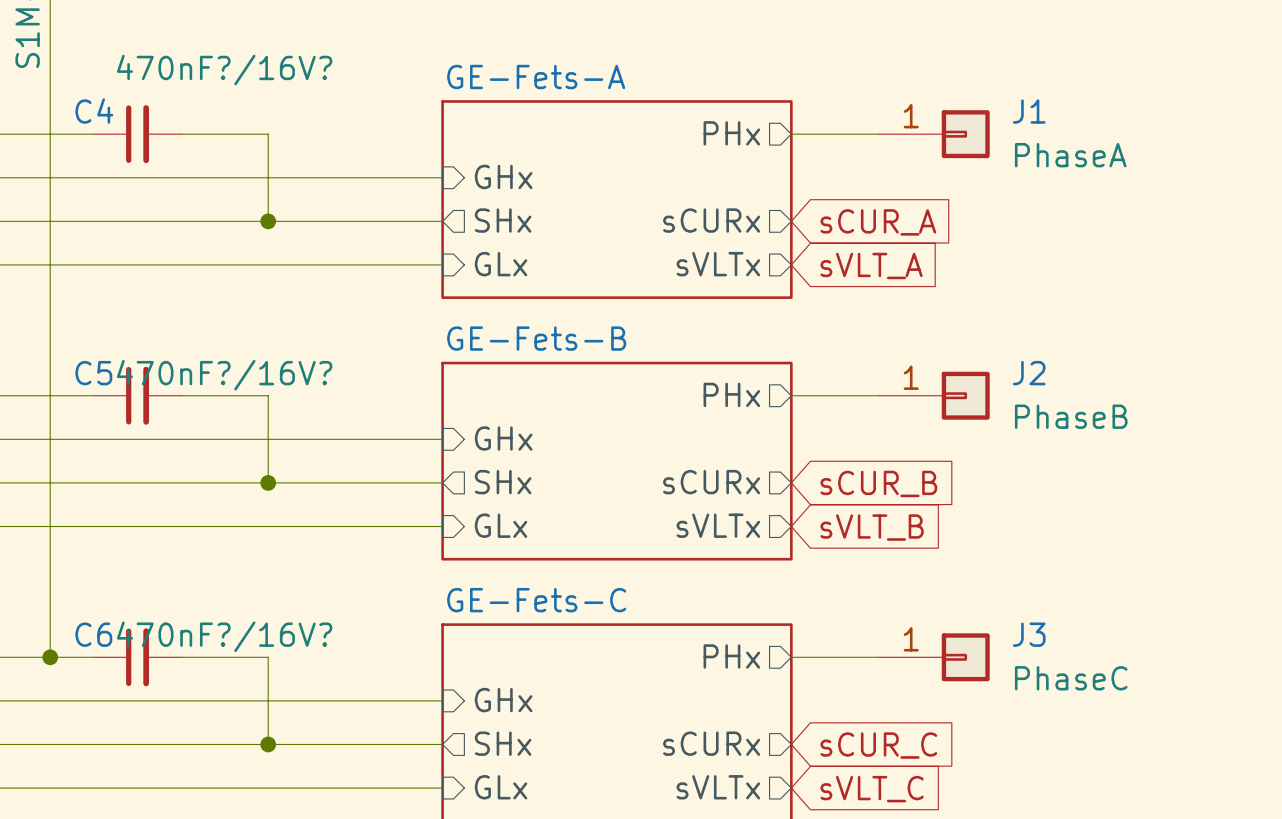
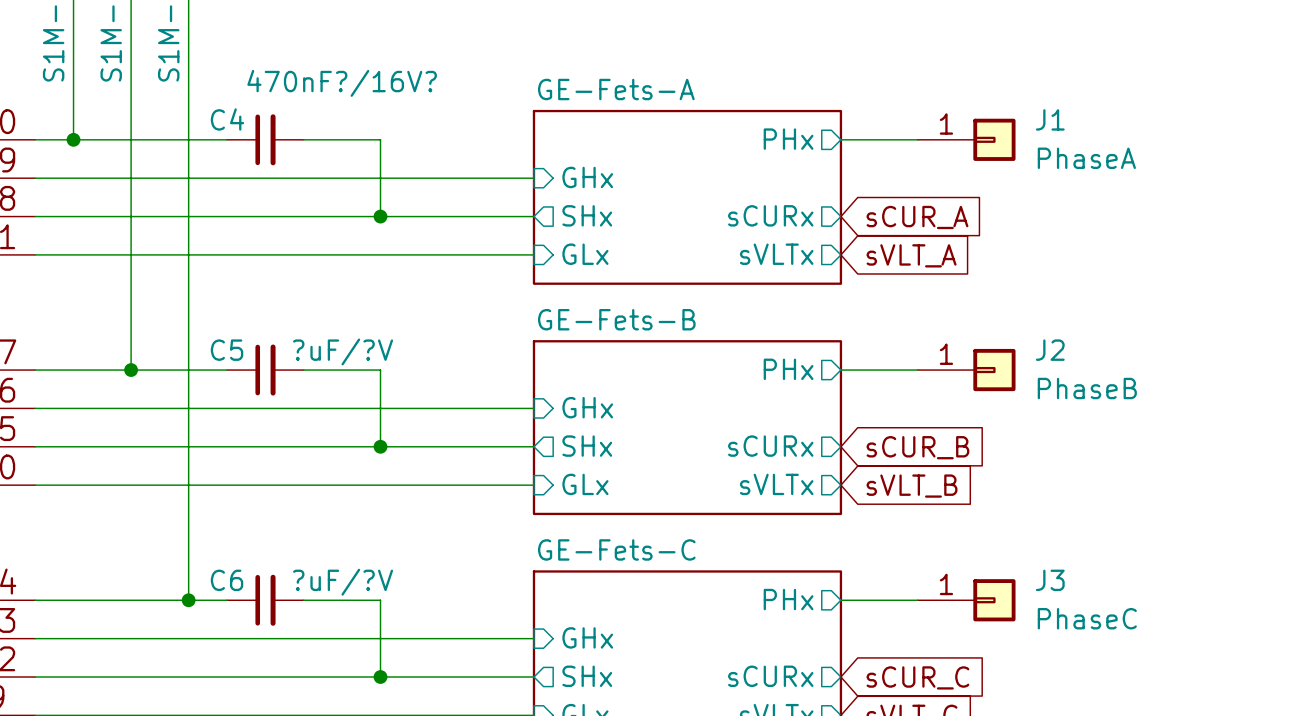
C5 value: 470nF?/16V? (224, 375) -> ?uF/?V (343, 351)
C6 value: 470nF?/16V? (224, 636) -> ?uF/?V (343, 582)

